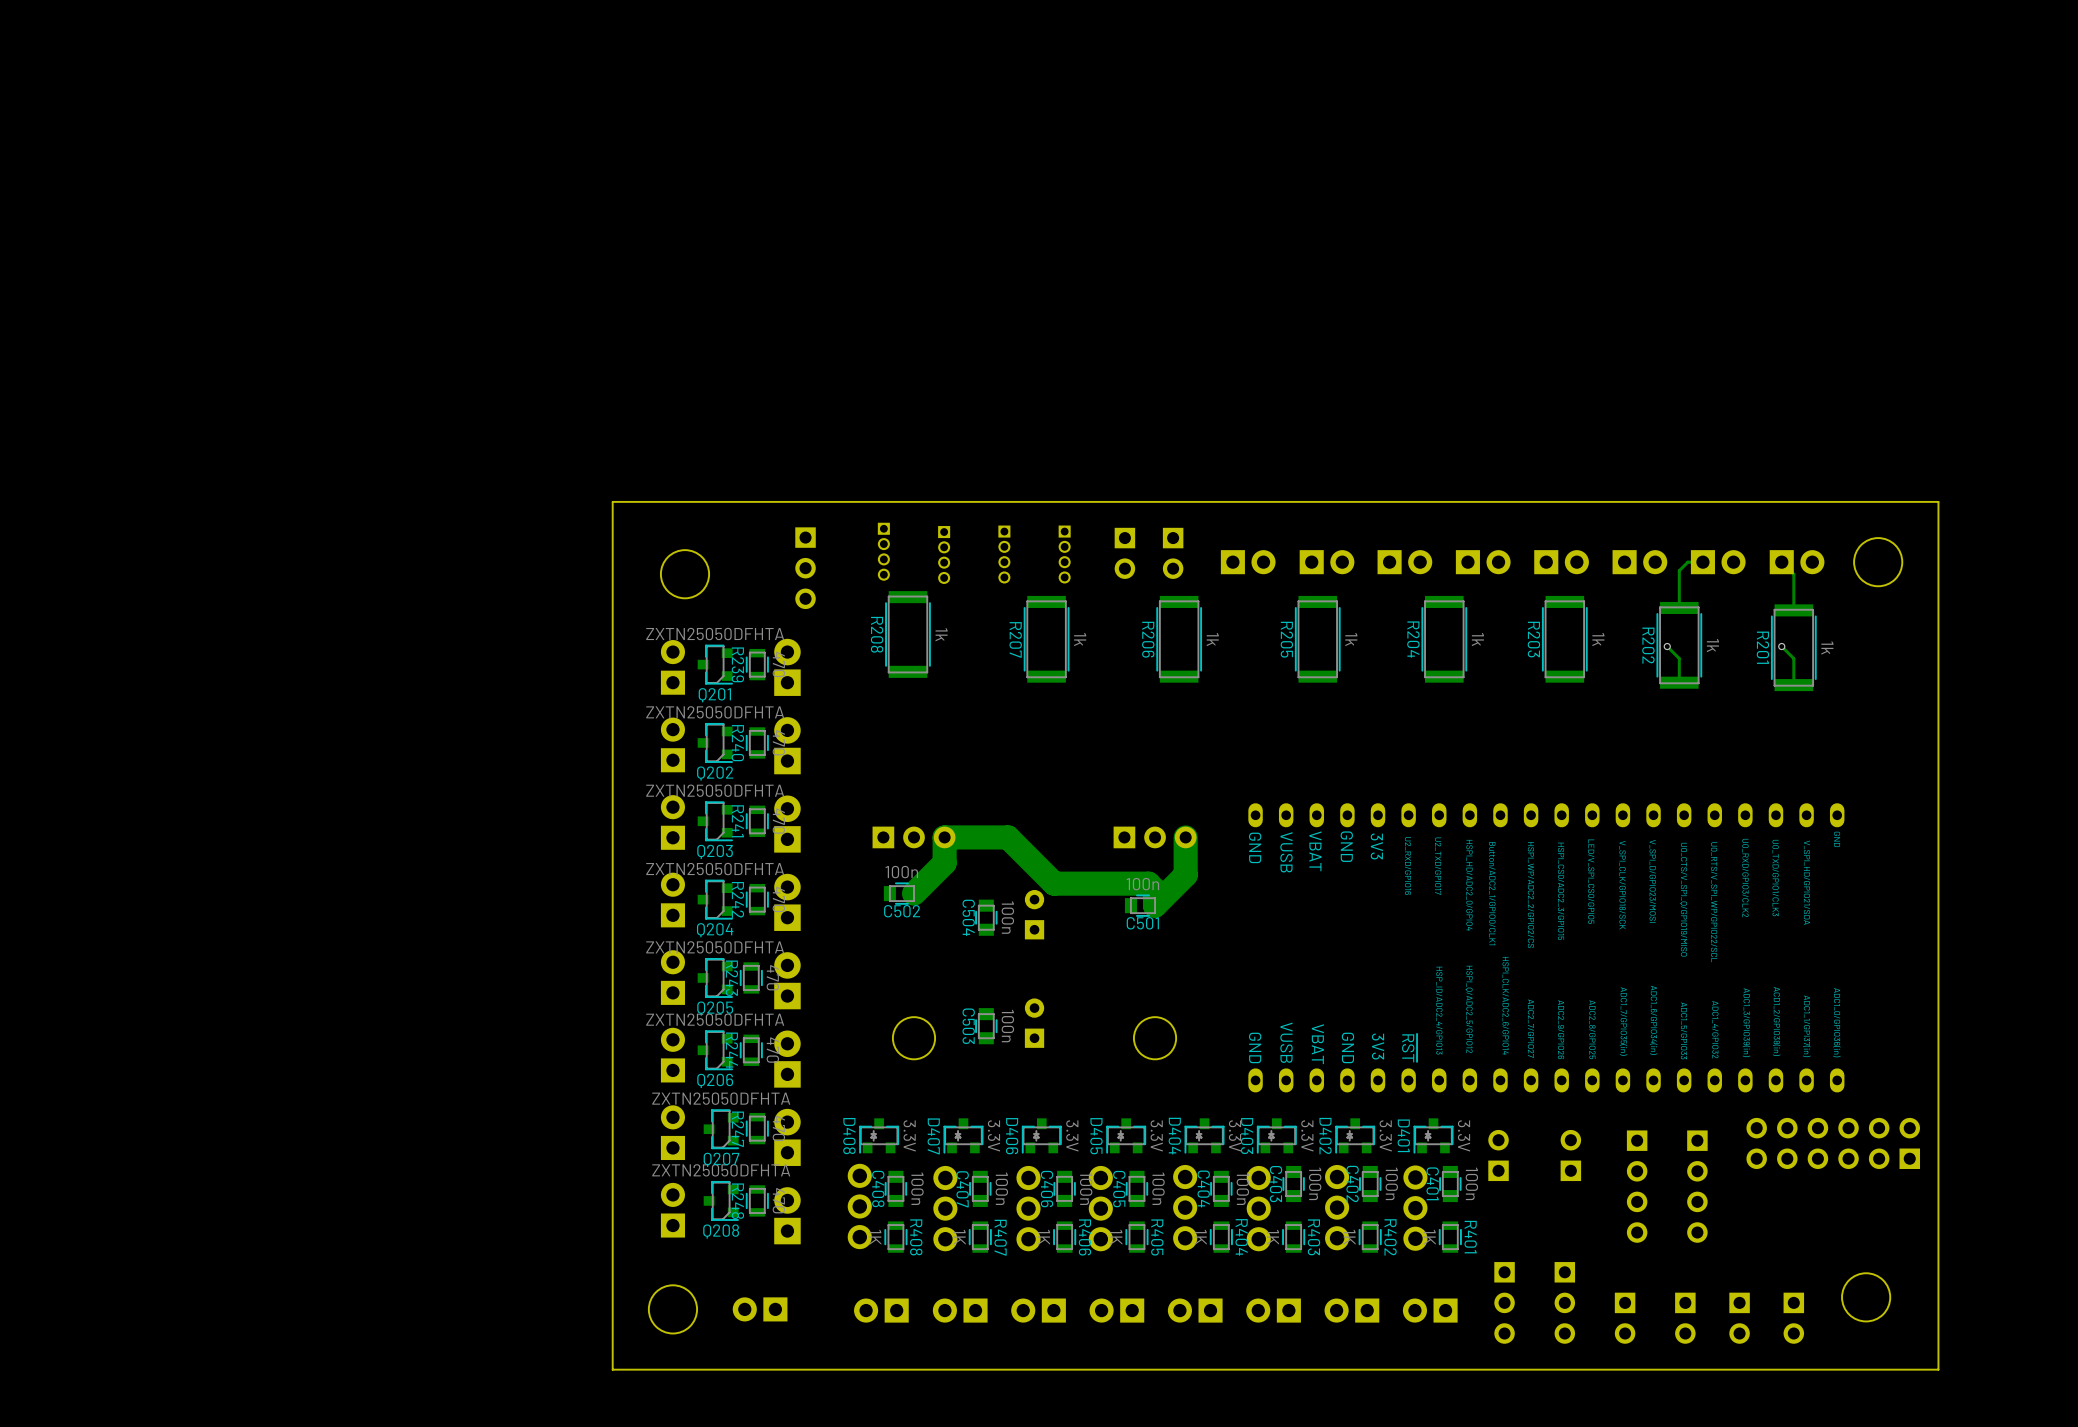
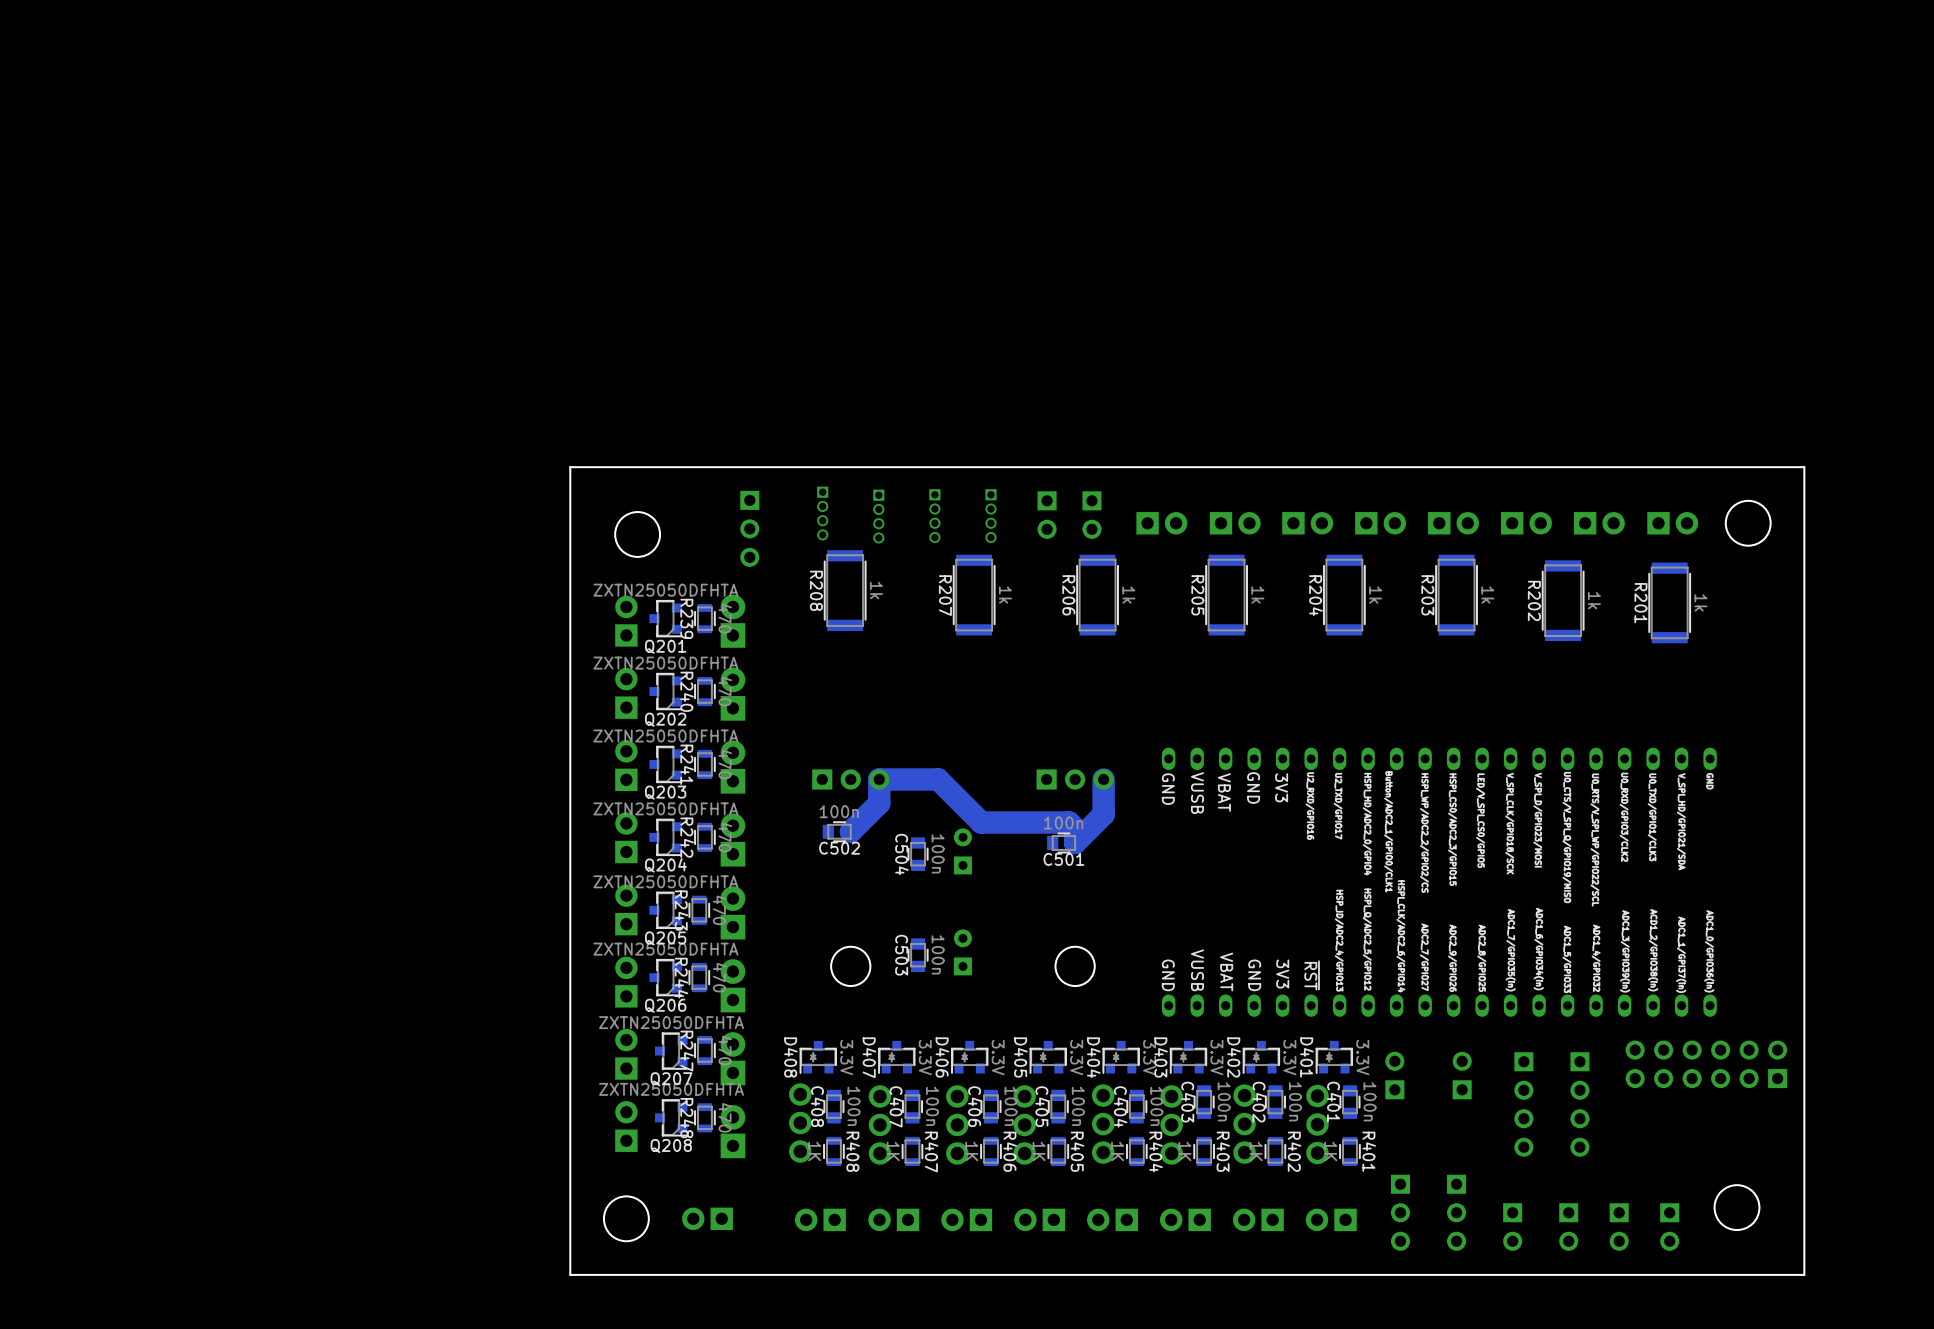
track: (1702, 562) (1687, 562) (1679, 570) (1679, 607) -> none
track: (1781, 562) (1793, 574) (1793, 610) -> none
track: (1667, 646) (1679, 658) (1679, 682) -> none
via: (1667, 646) -> none
track: (1781, 646) (1793, 658) (1793, 685) -> none
via: (1781, 646) -> none

